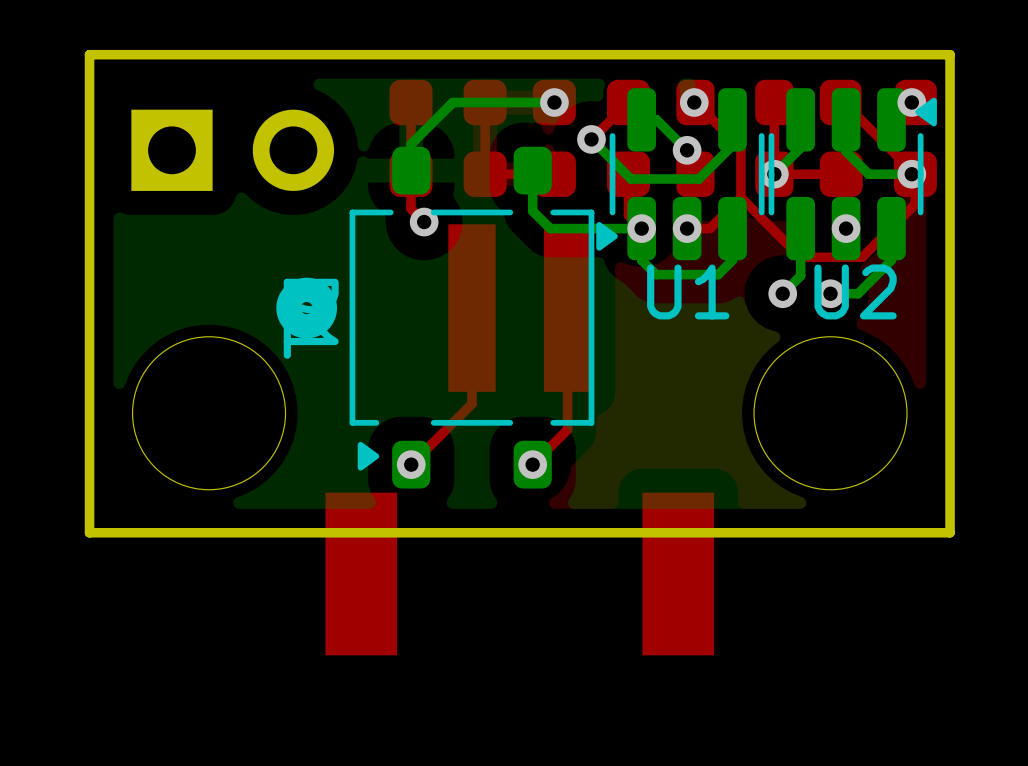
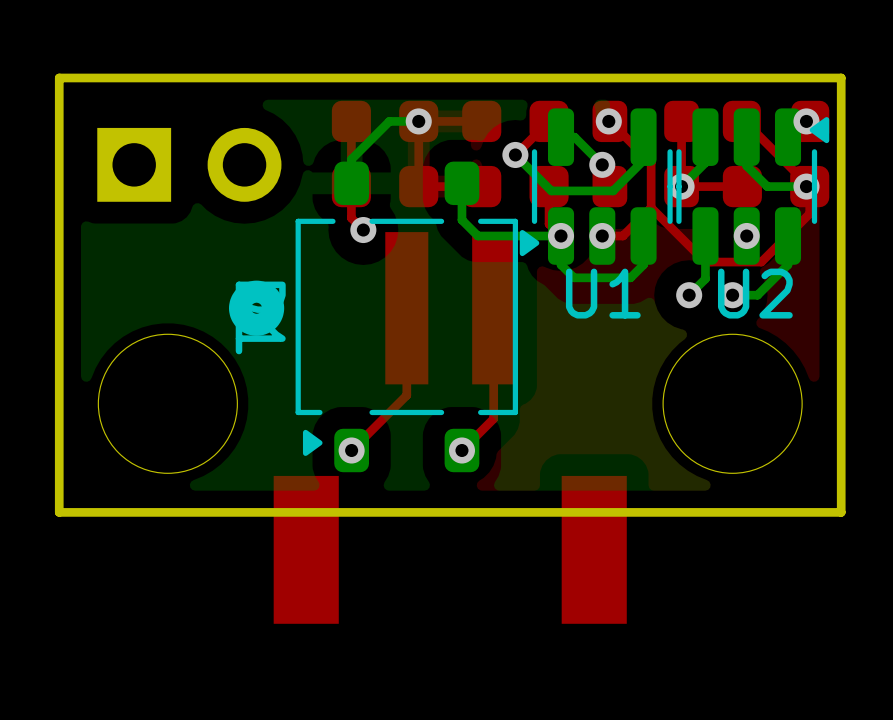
bottom track: (554, 102) (485, 102) -> none
via position: (554, 102) -> (418, 121)

